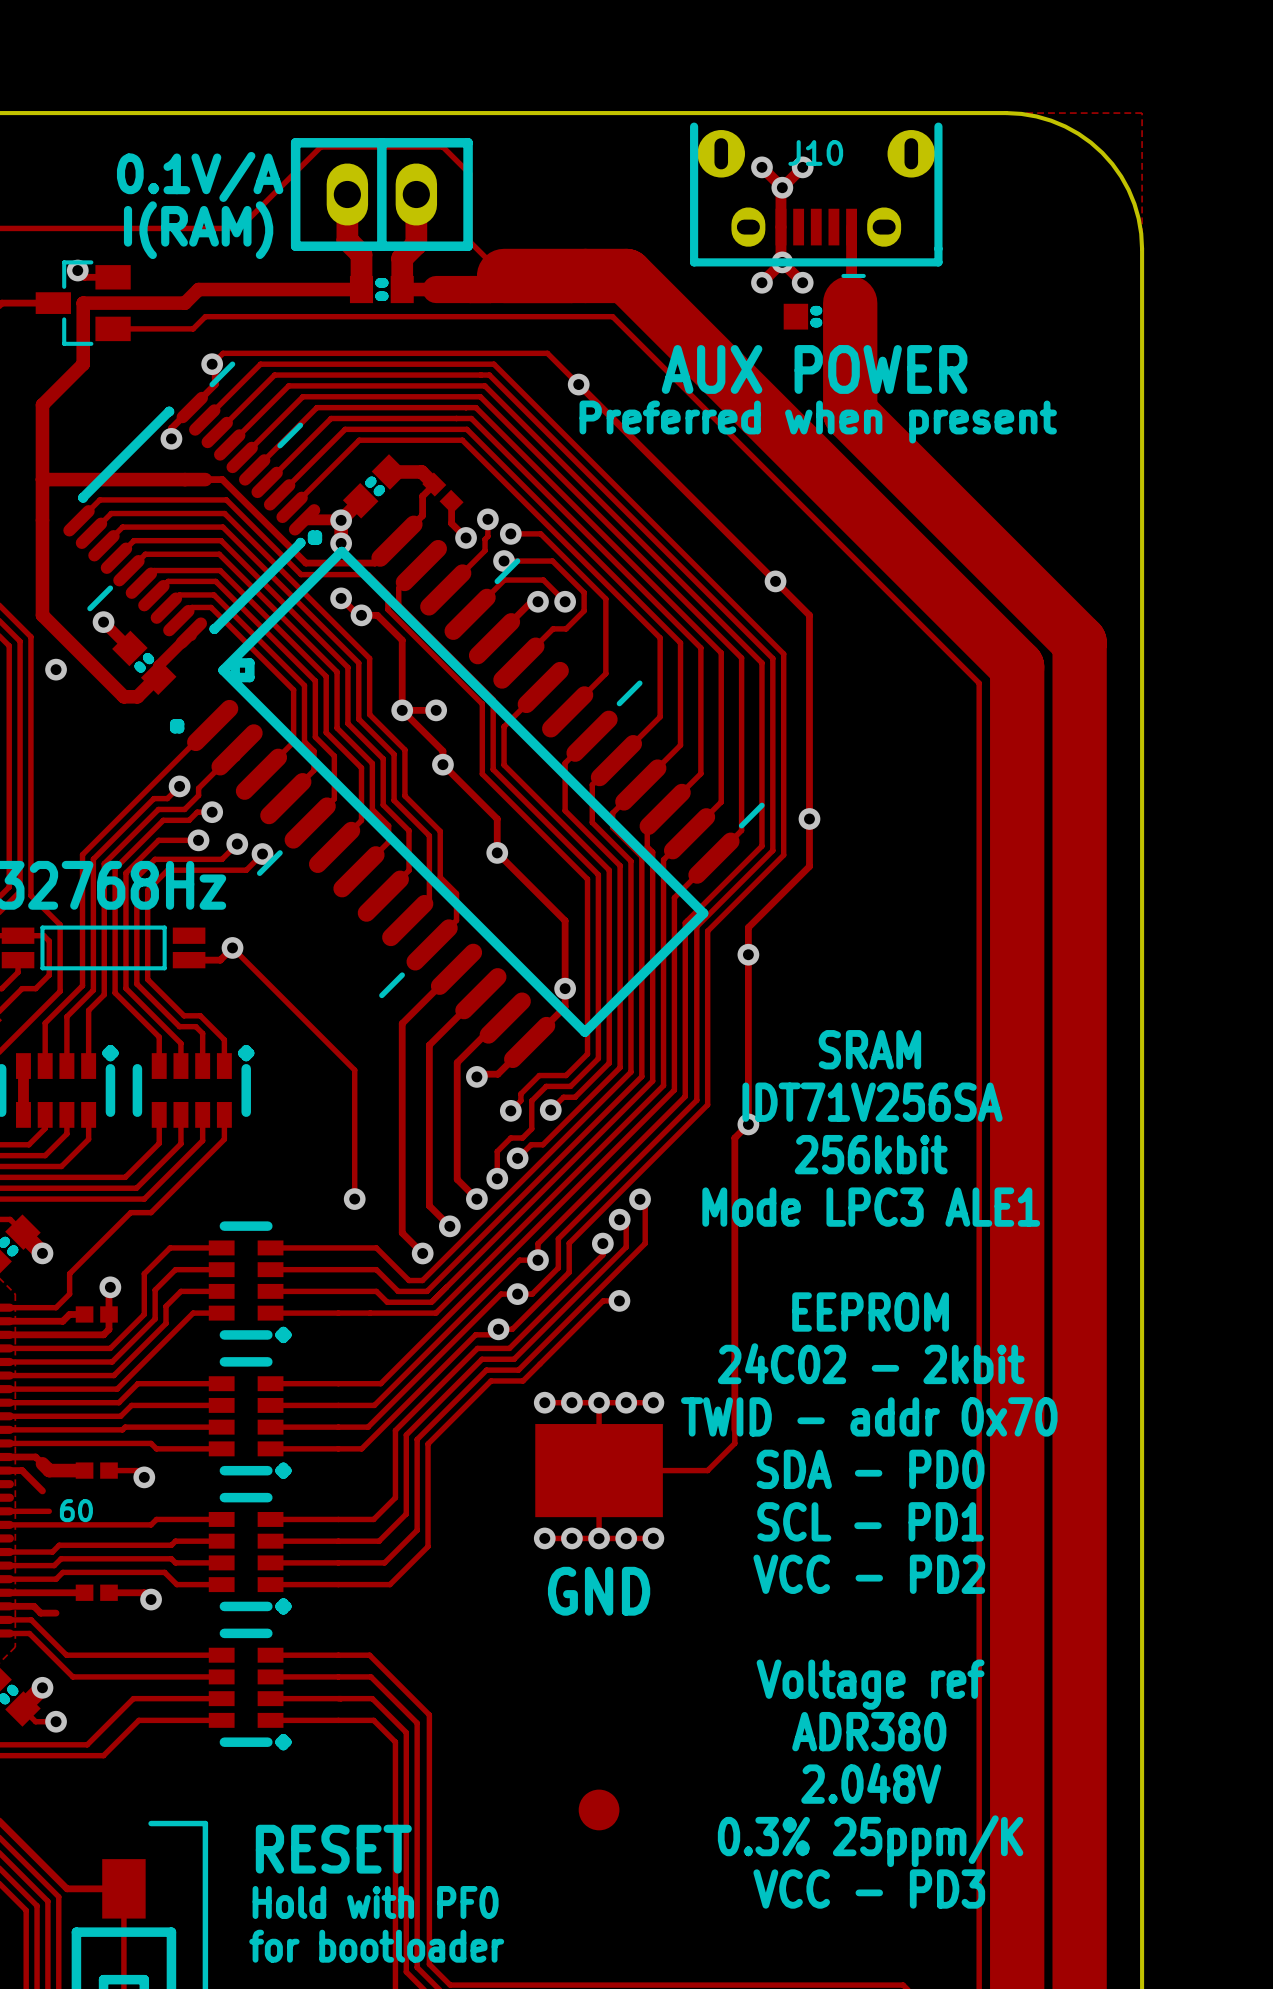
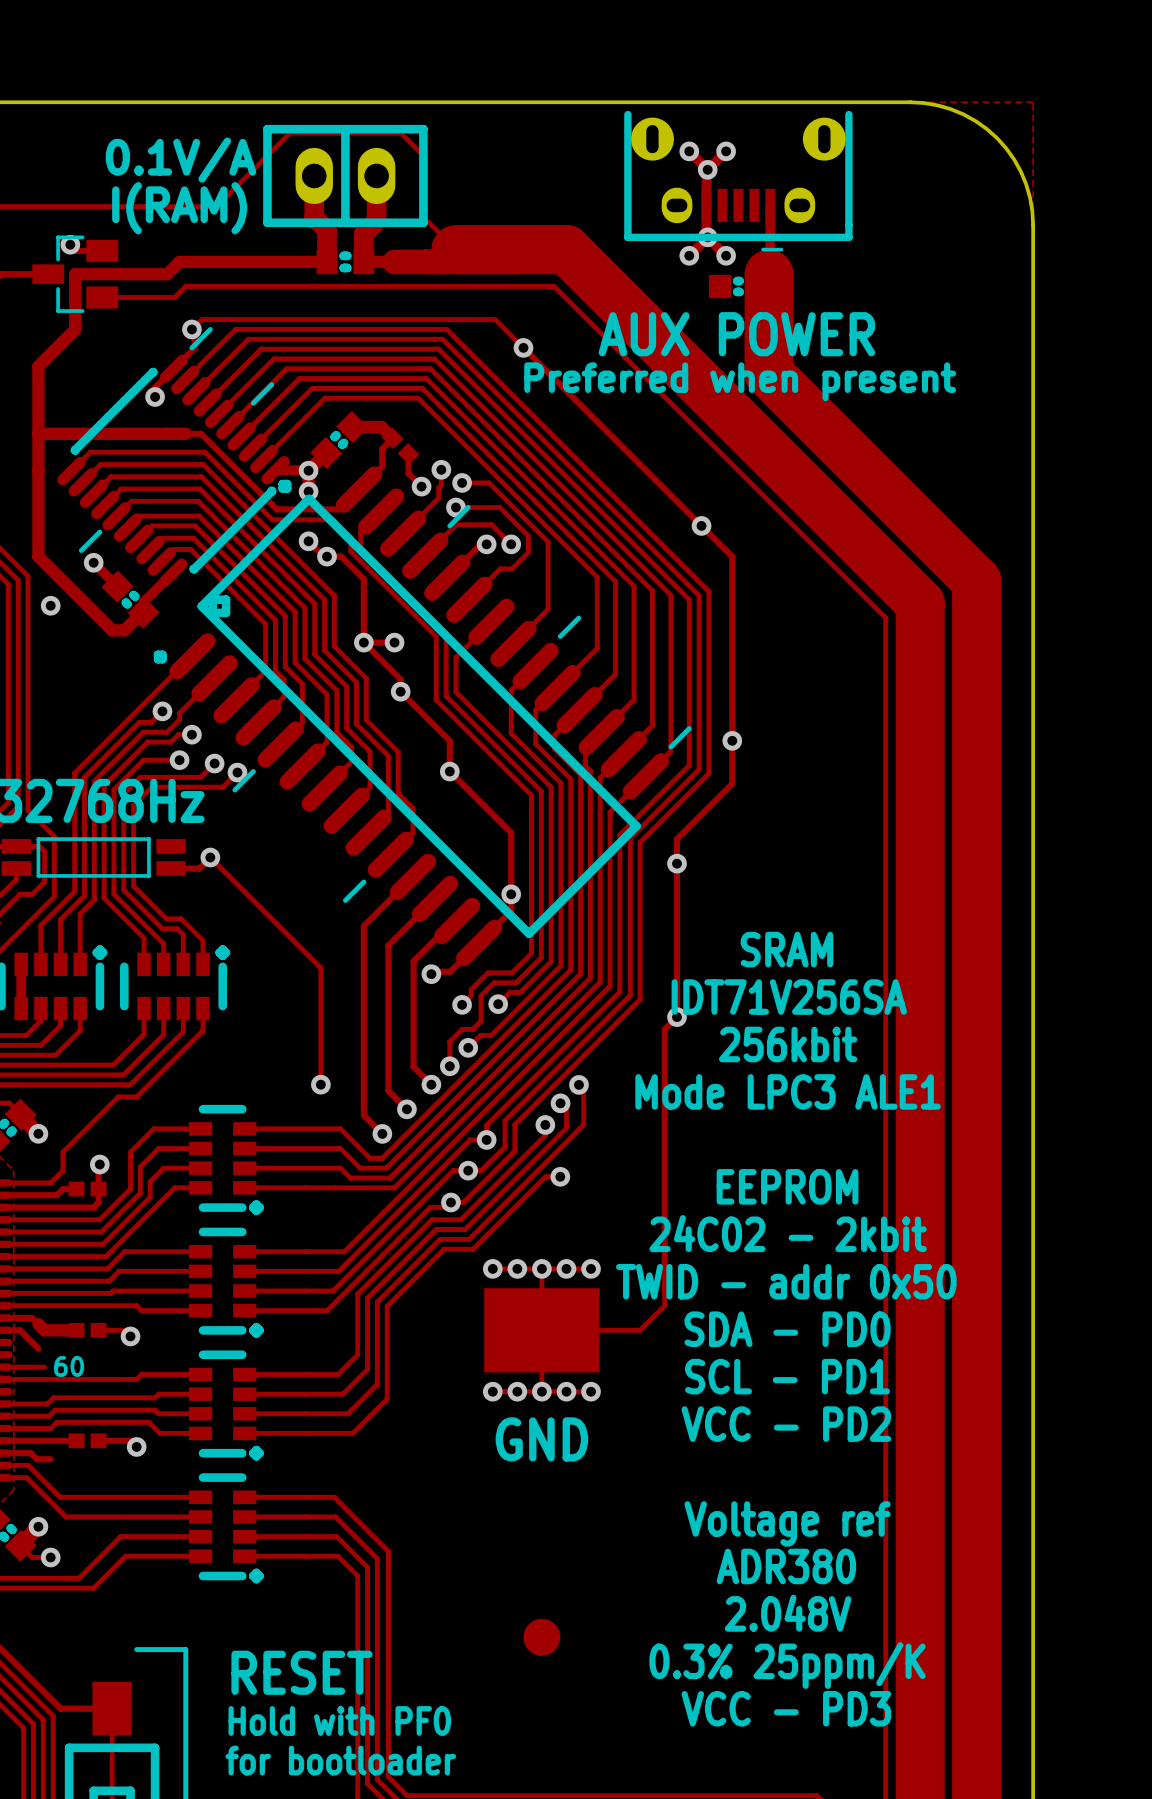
J10 name: J10 (815, 152) -> none
text: TWID - addr 0x70 (869, 1416) -> TWID - addr 0x50 (786, 1281)

